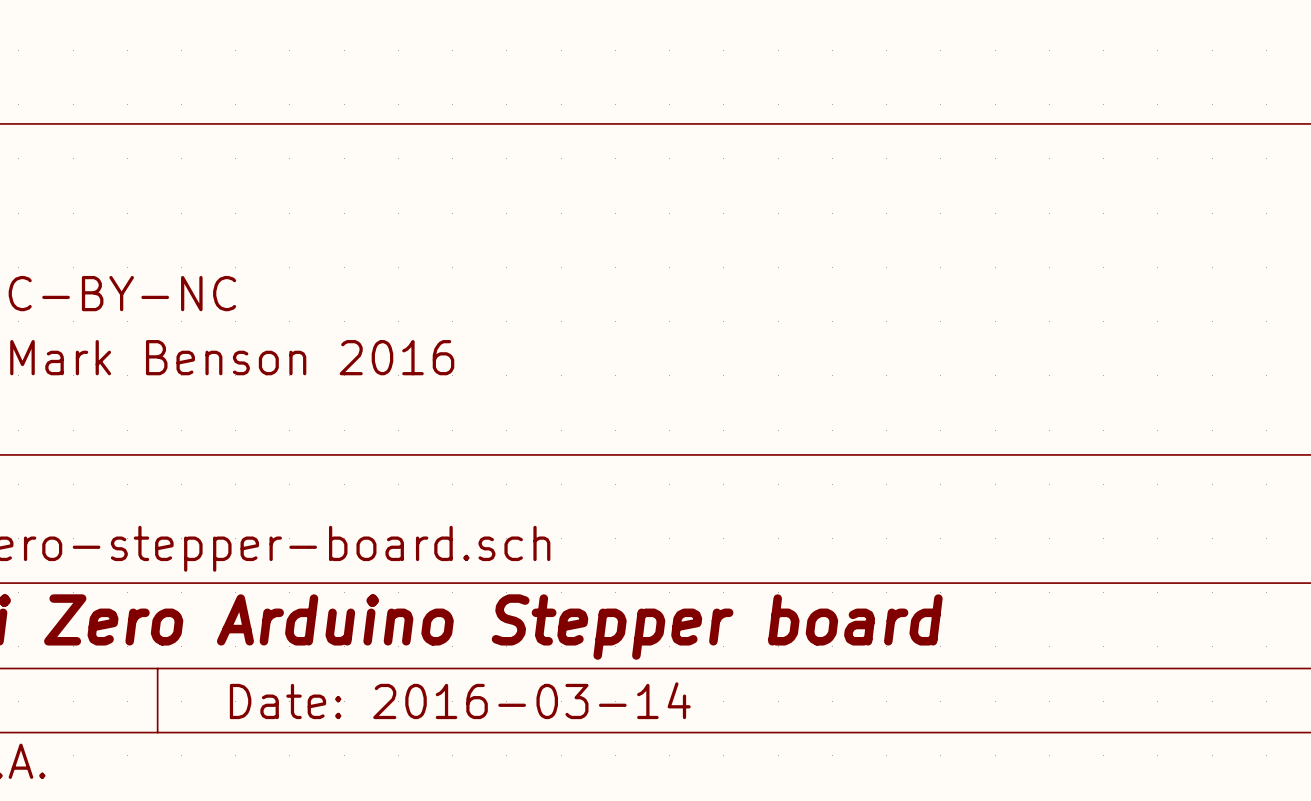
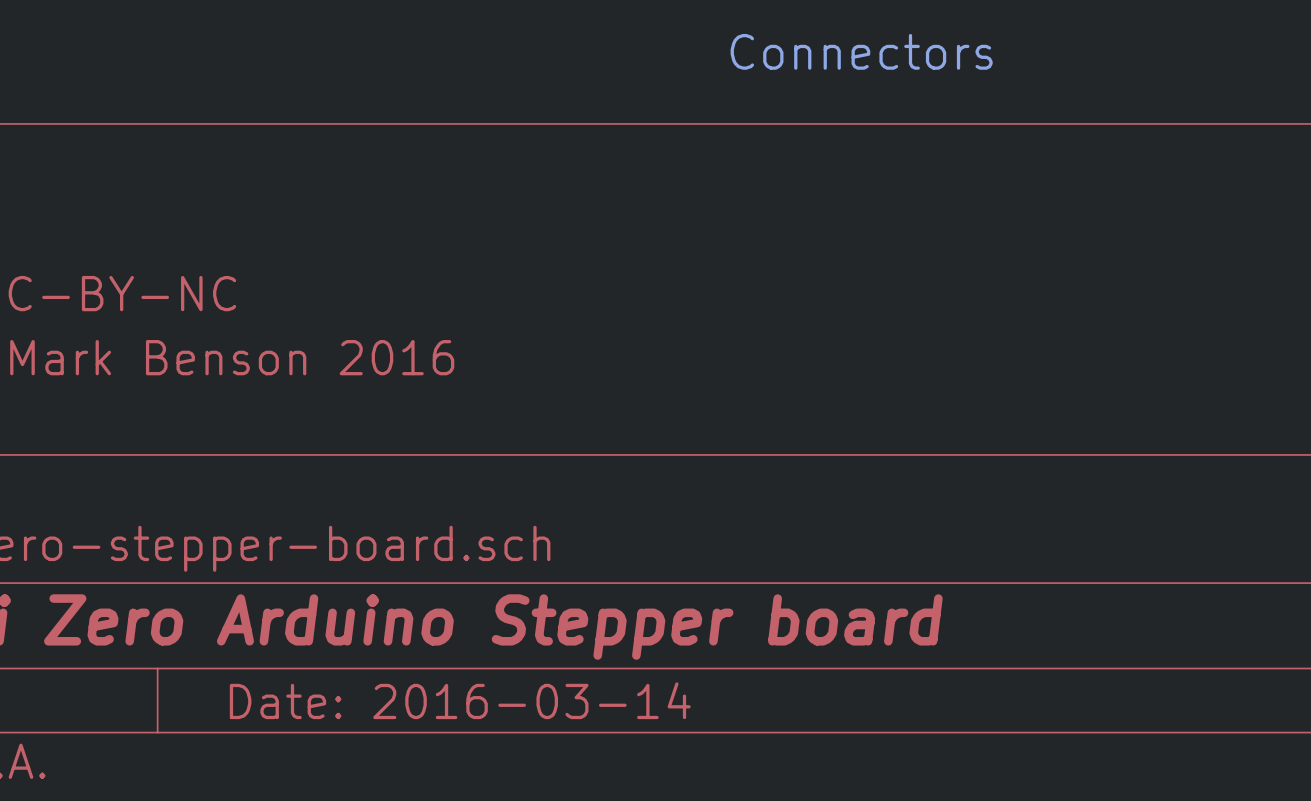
text: none -> Connectors (861, 51)

